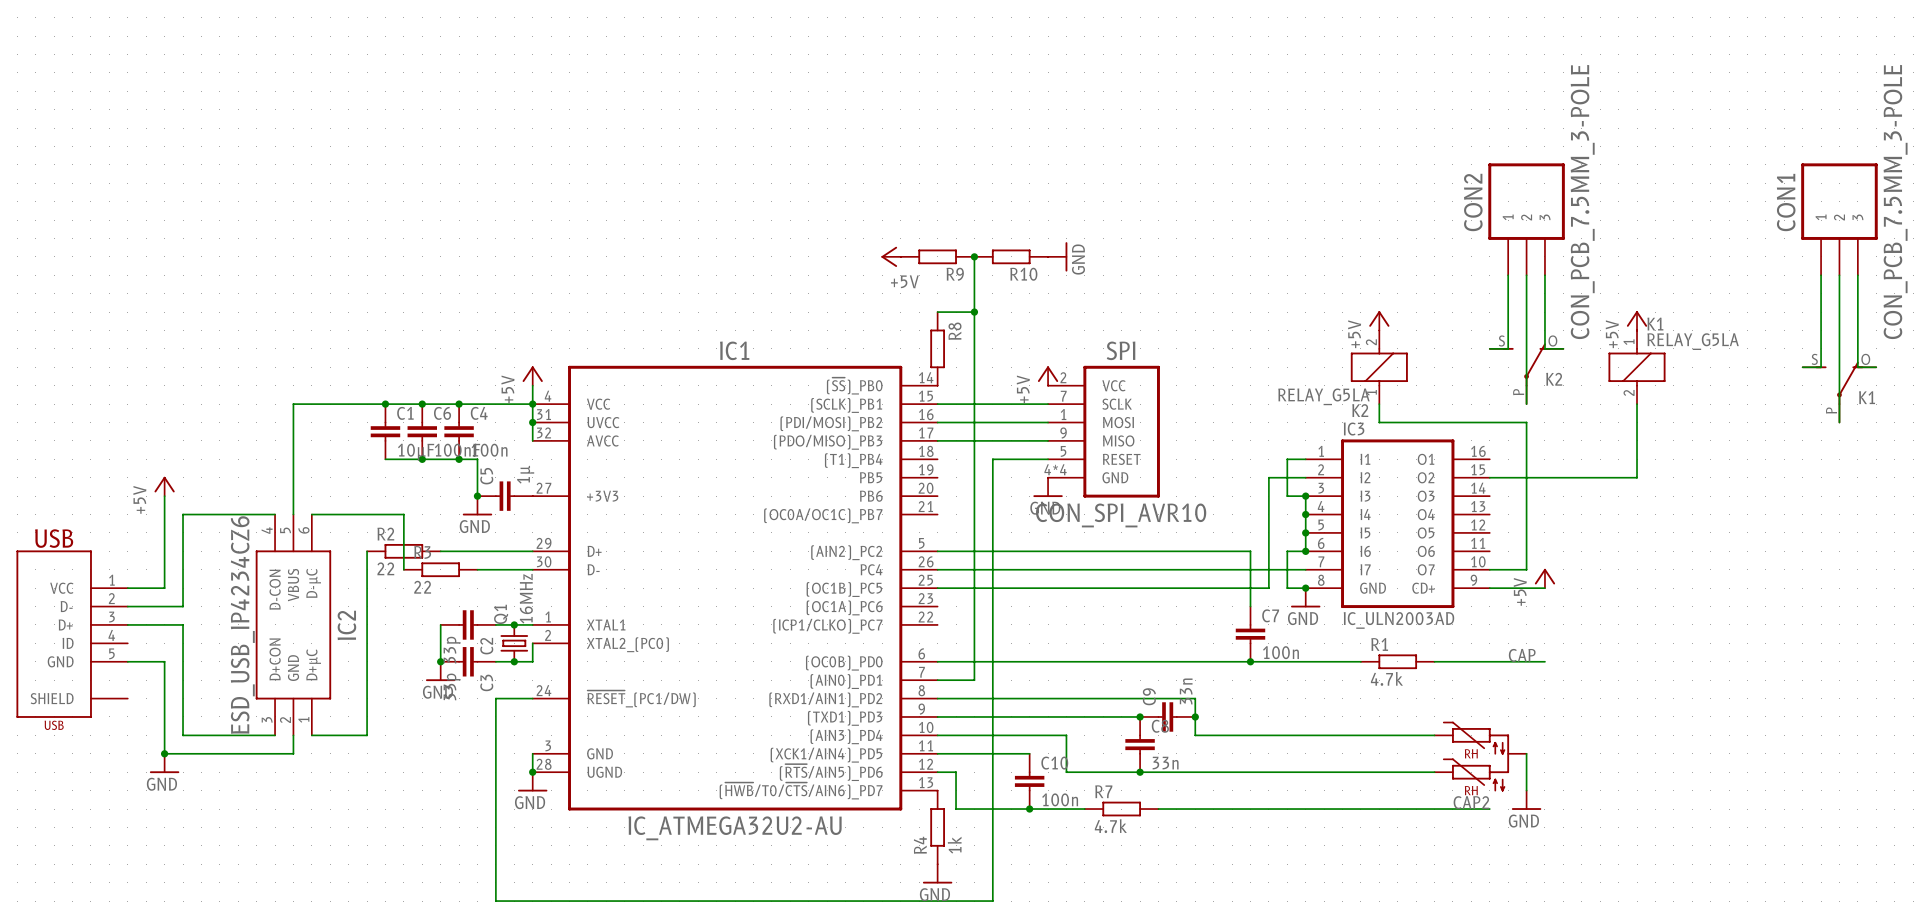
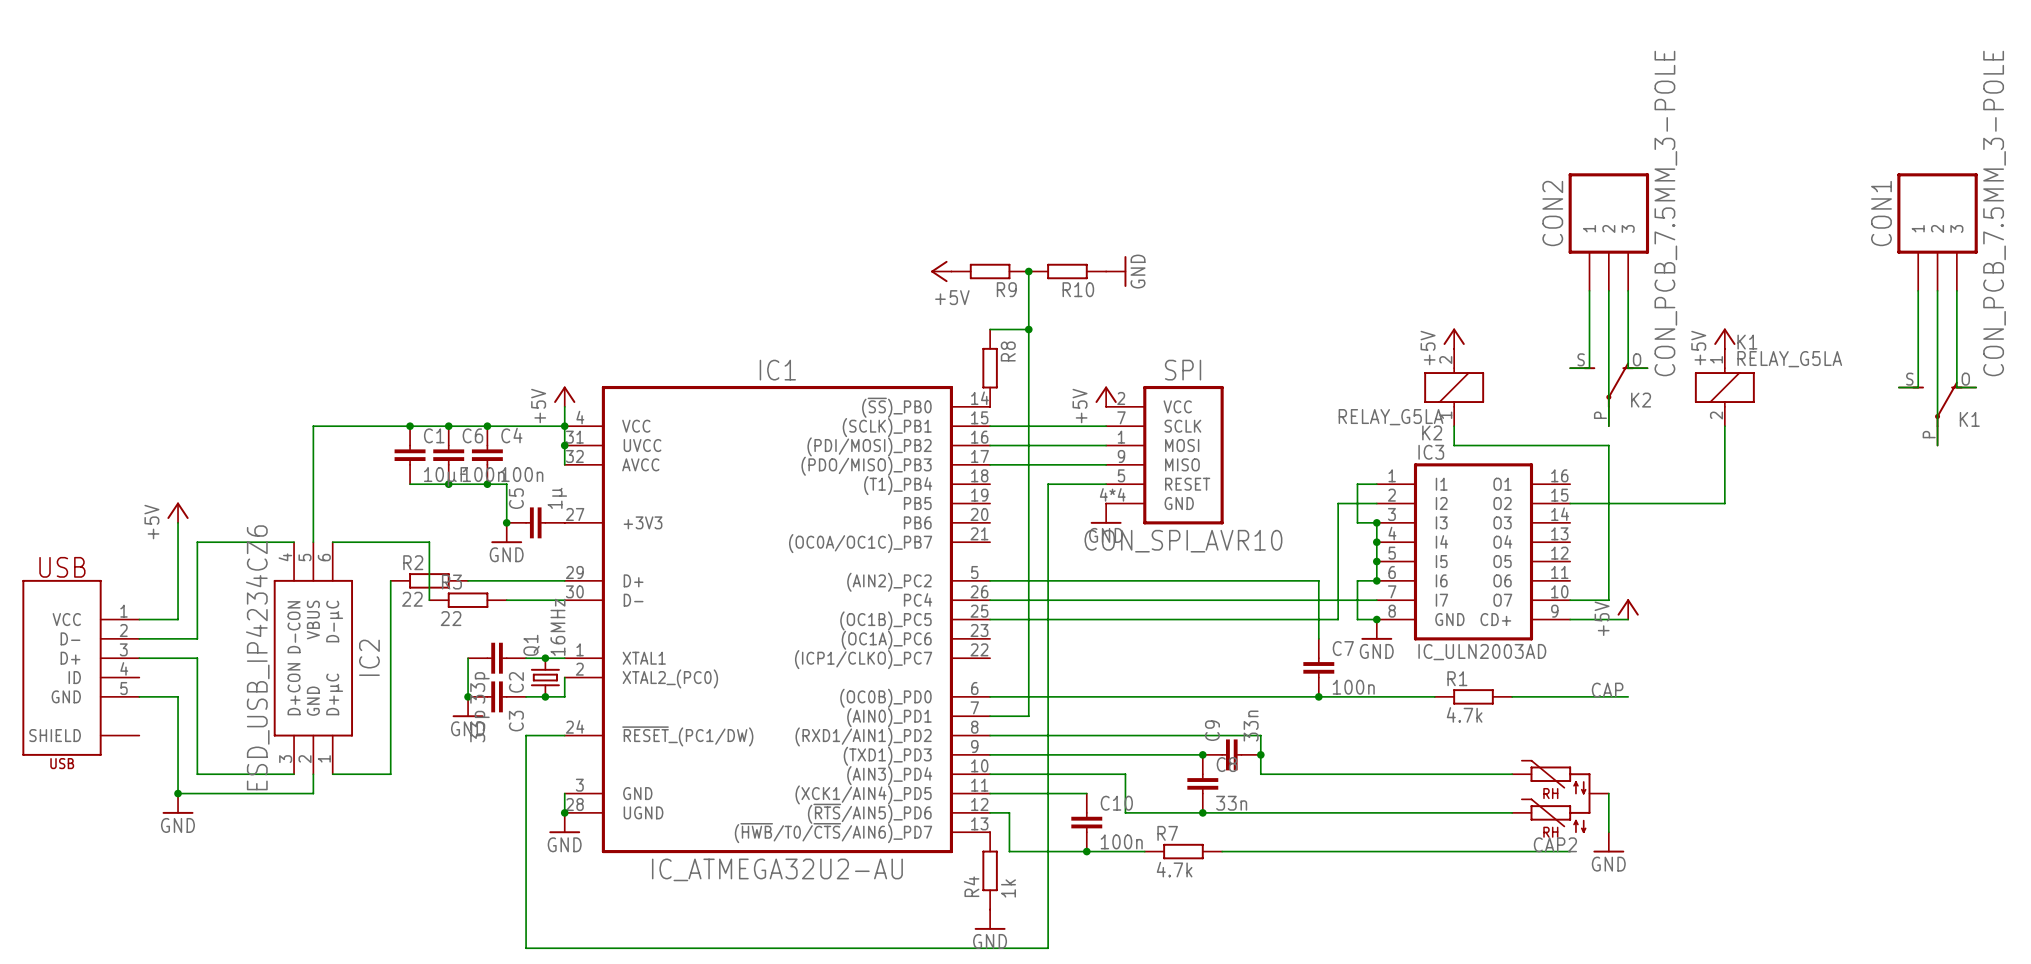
C6 value: 100nF (457, 450) -> 100n (483, 474)

